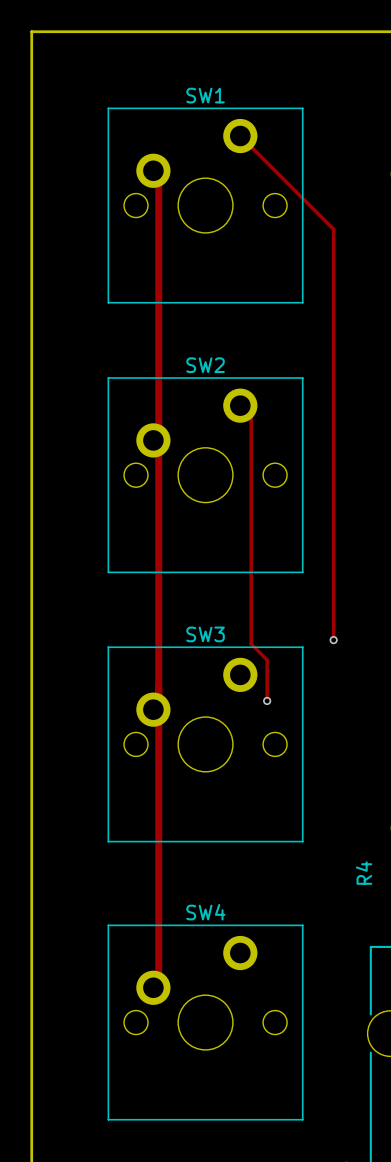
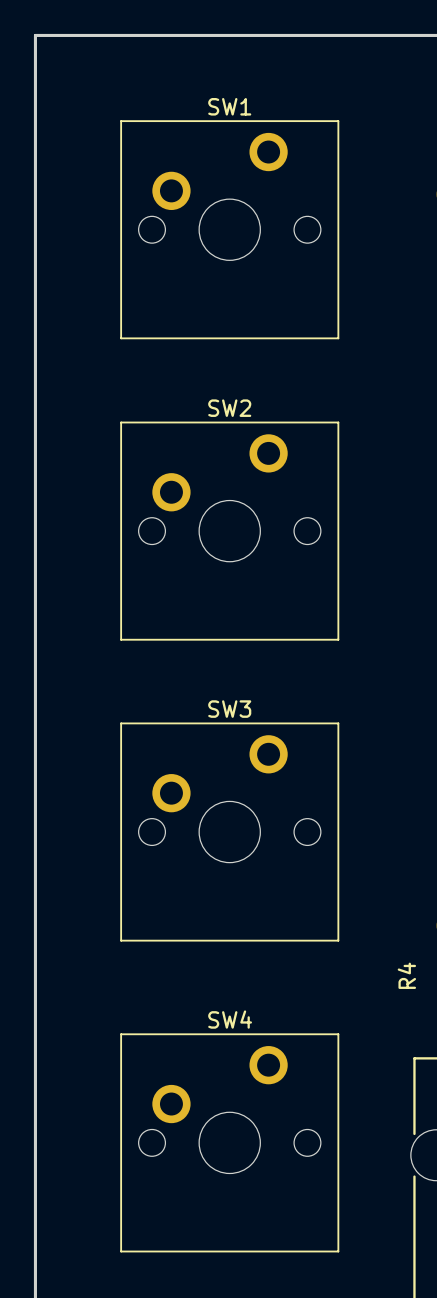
track: (240, 136) (333, 229) (333, 640) -> none
track: (153, 170) (158, 176) (158, 435) (153, 440) (158, 445) (158, 982) (153, 987) -> none
track: (240, 405) (251, 416) (251, 644) (267, 660) (267, 700) -> none
via: (333, 640) -> none
via: (267, 700) -> none

